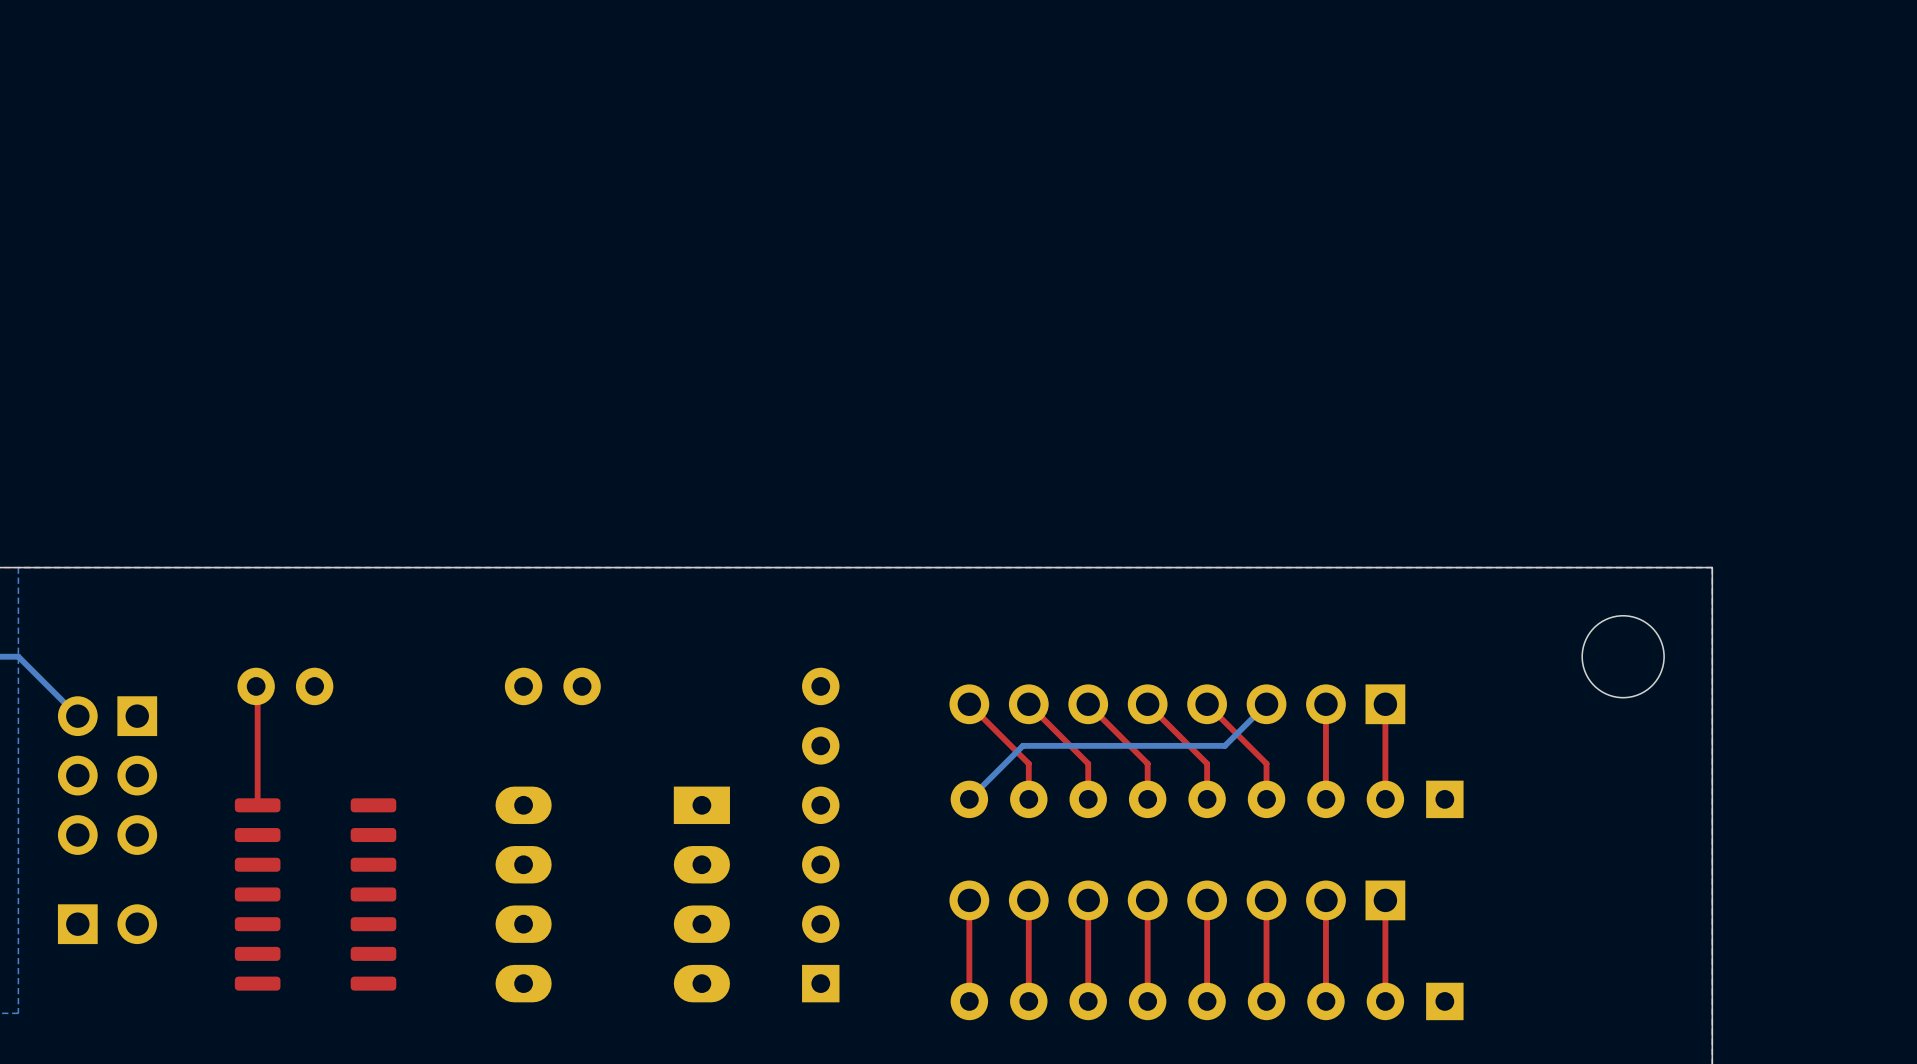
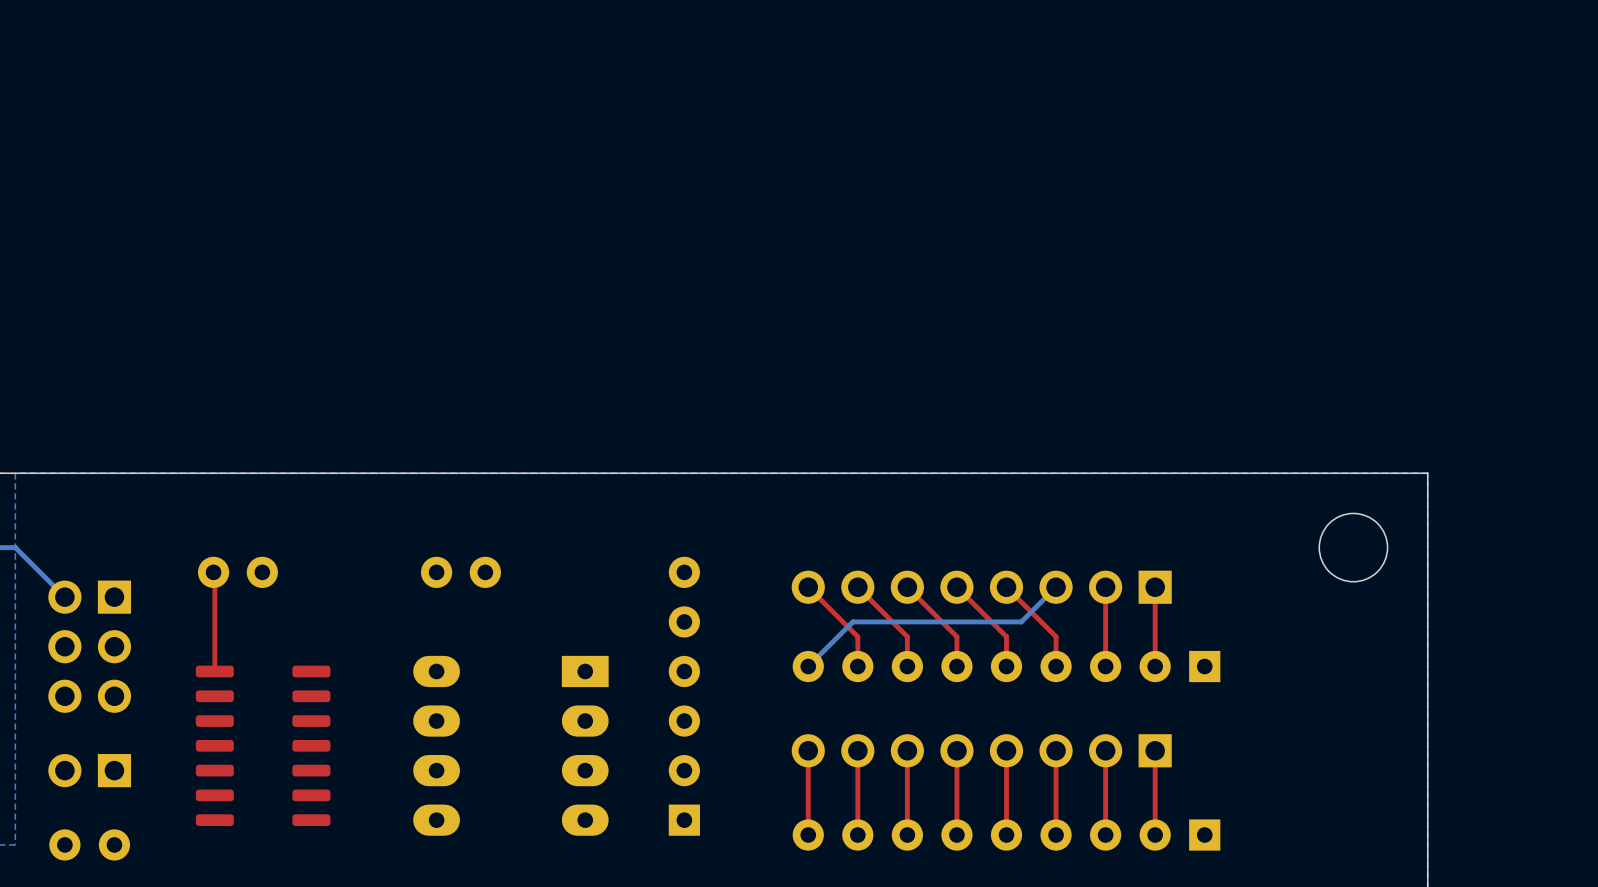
part rotation: 0° (107, 924) -> 180° (89, 770)
part: none -> (89, 844)

